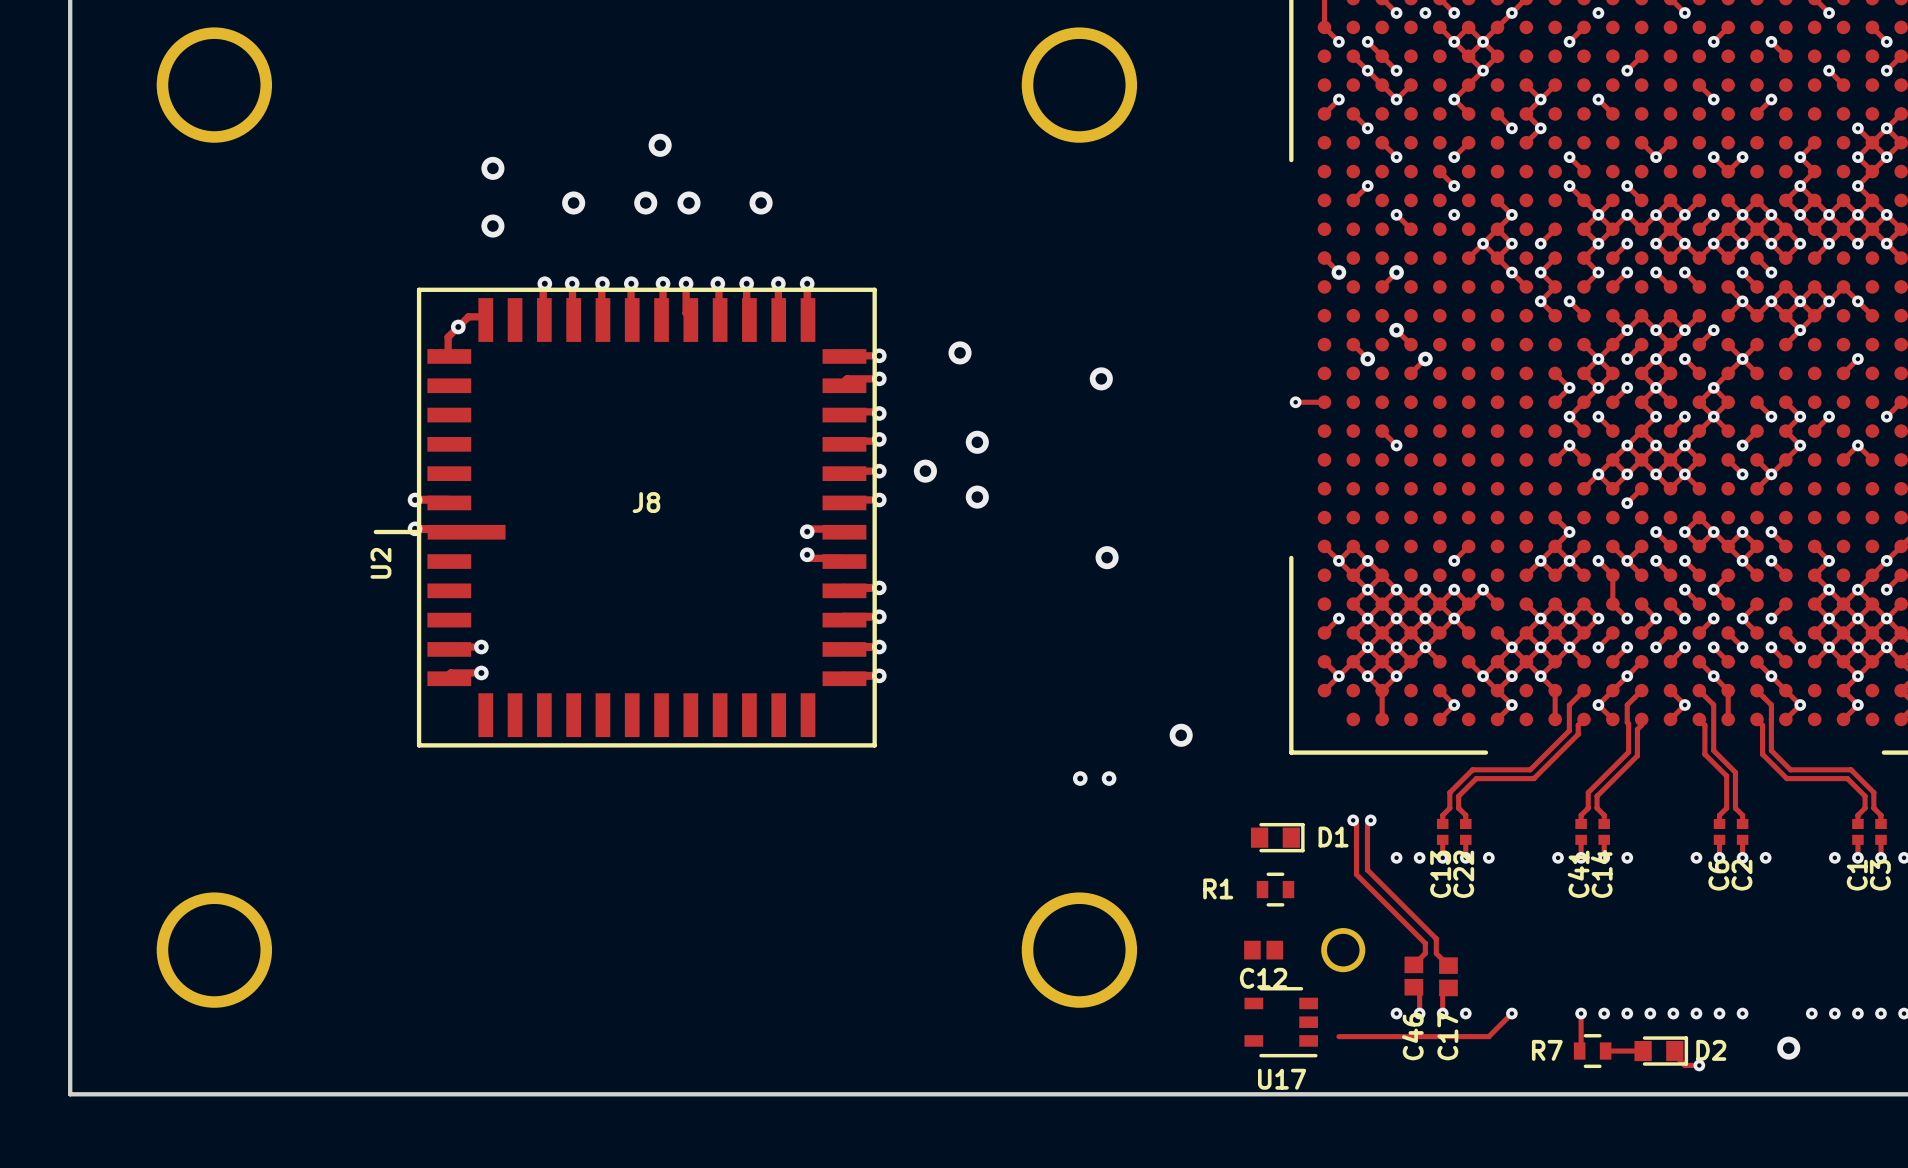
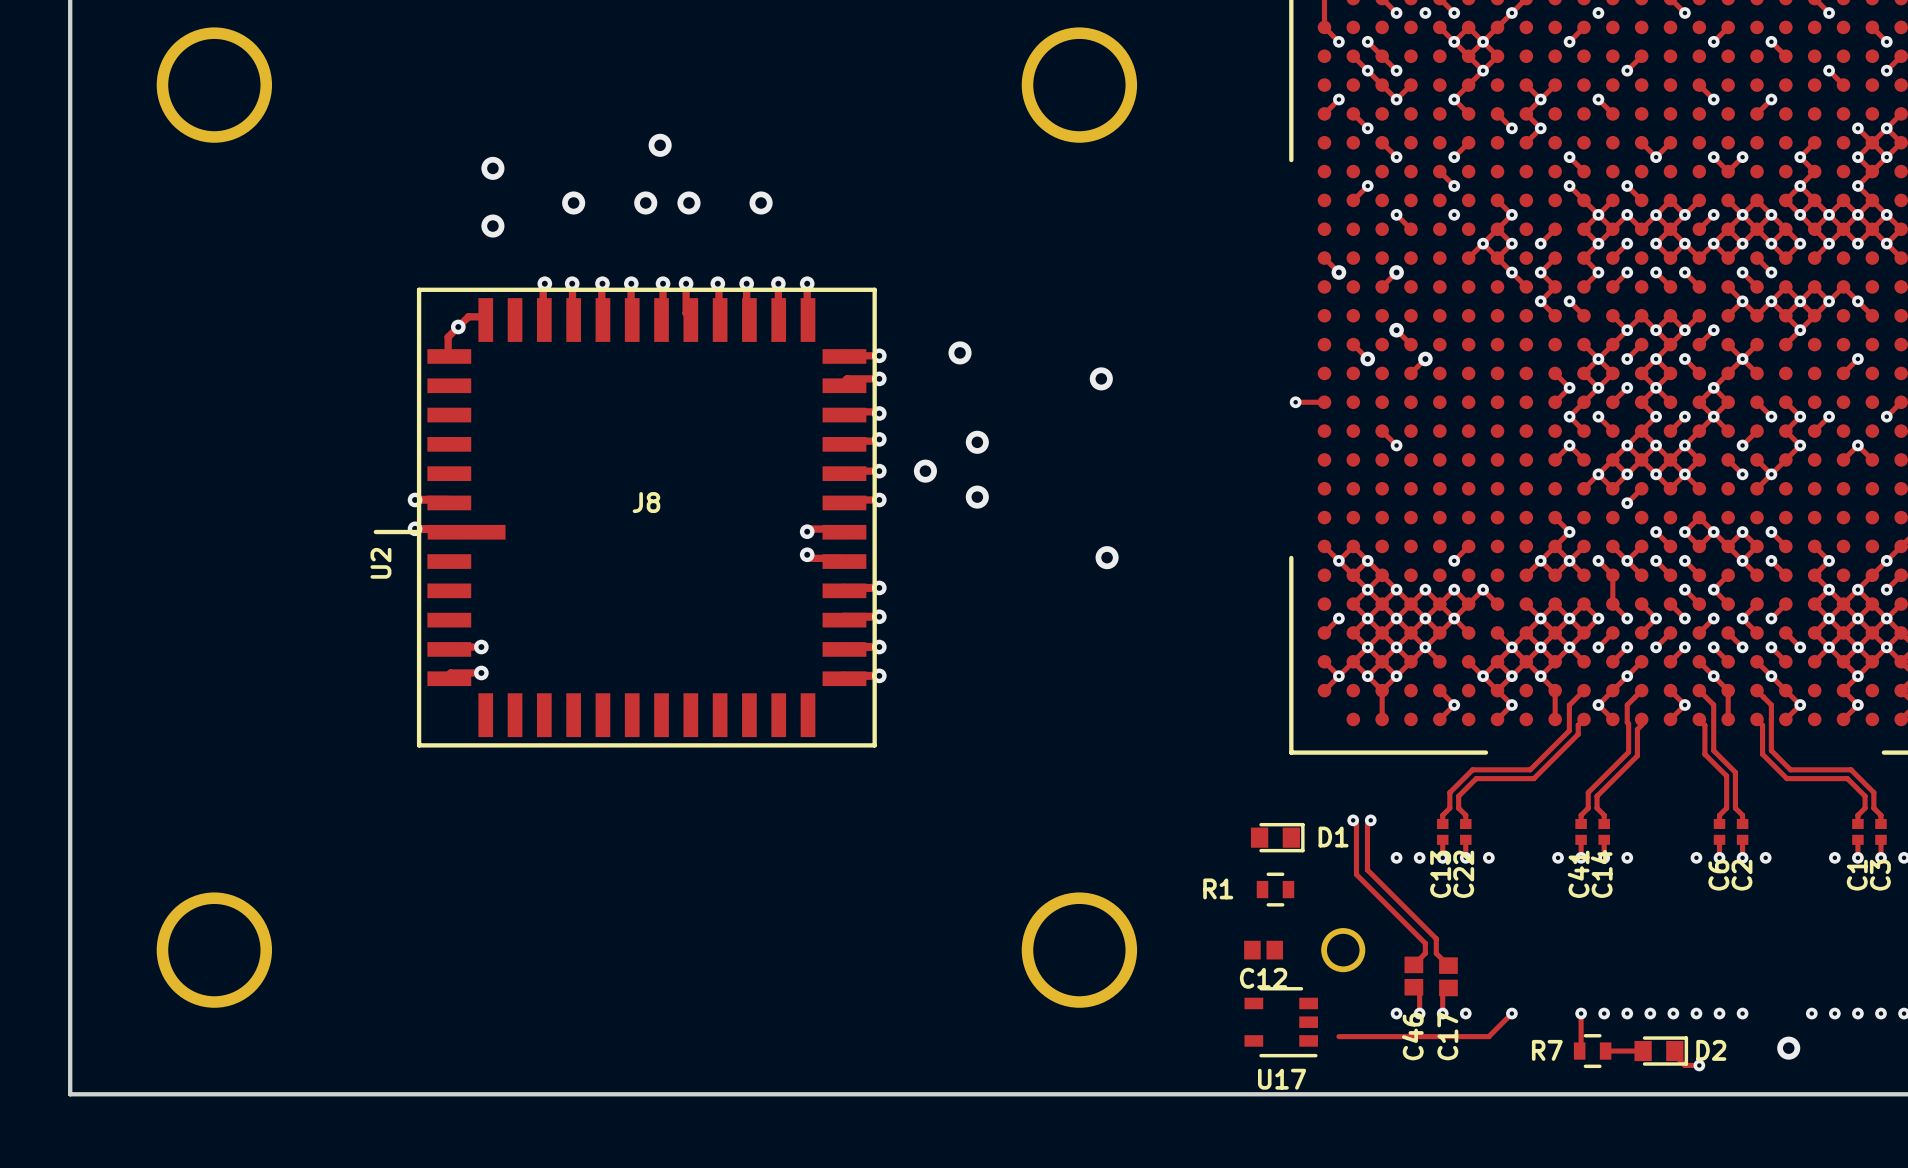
via: (1181, 735) -> none
via: (1080, 778) -> none
via: (1109, 778) -> none

